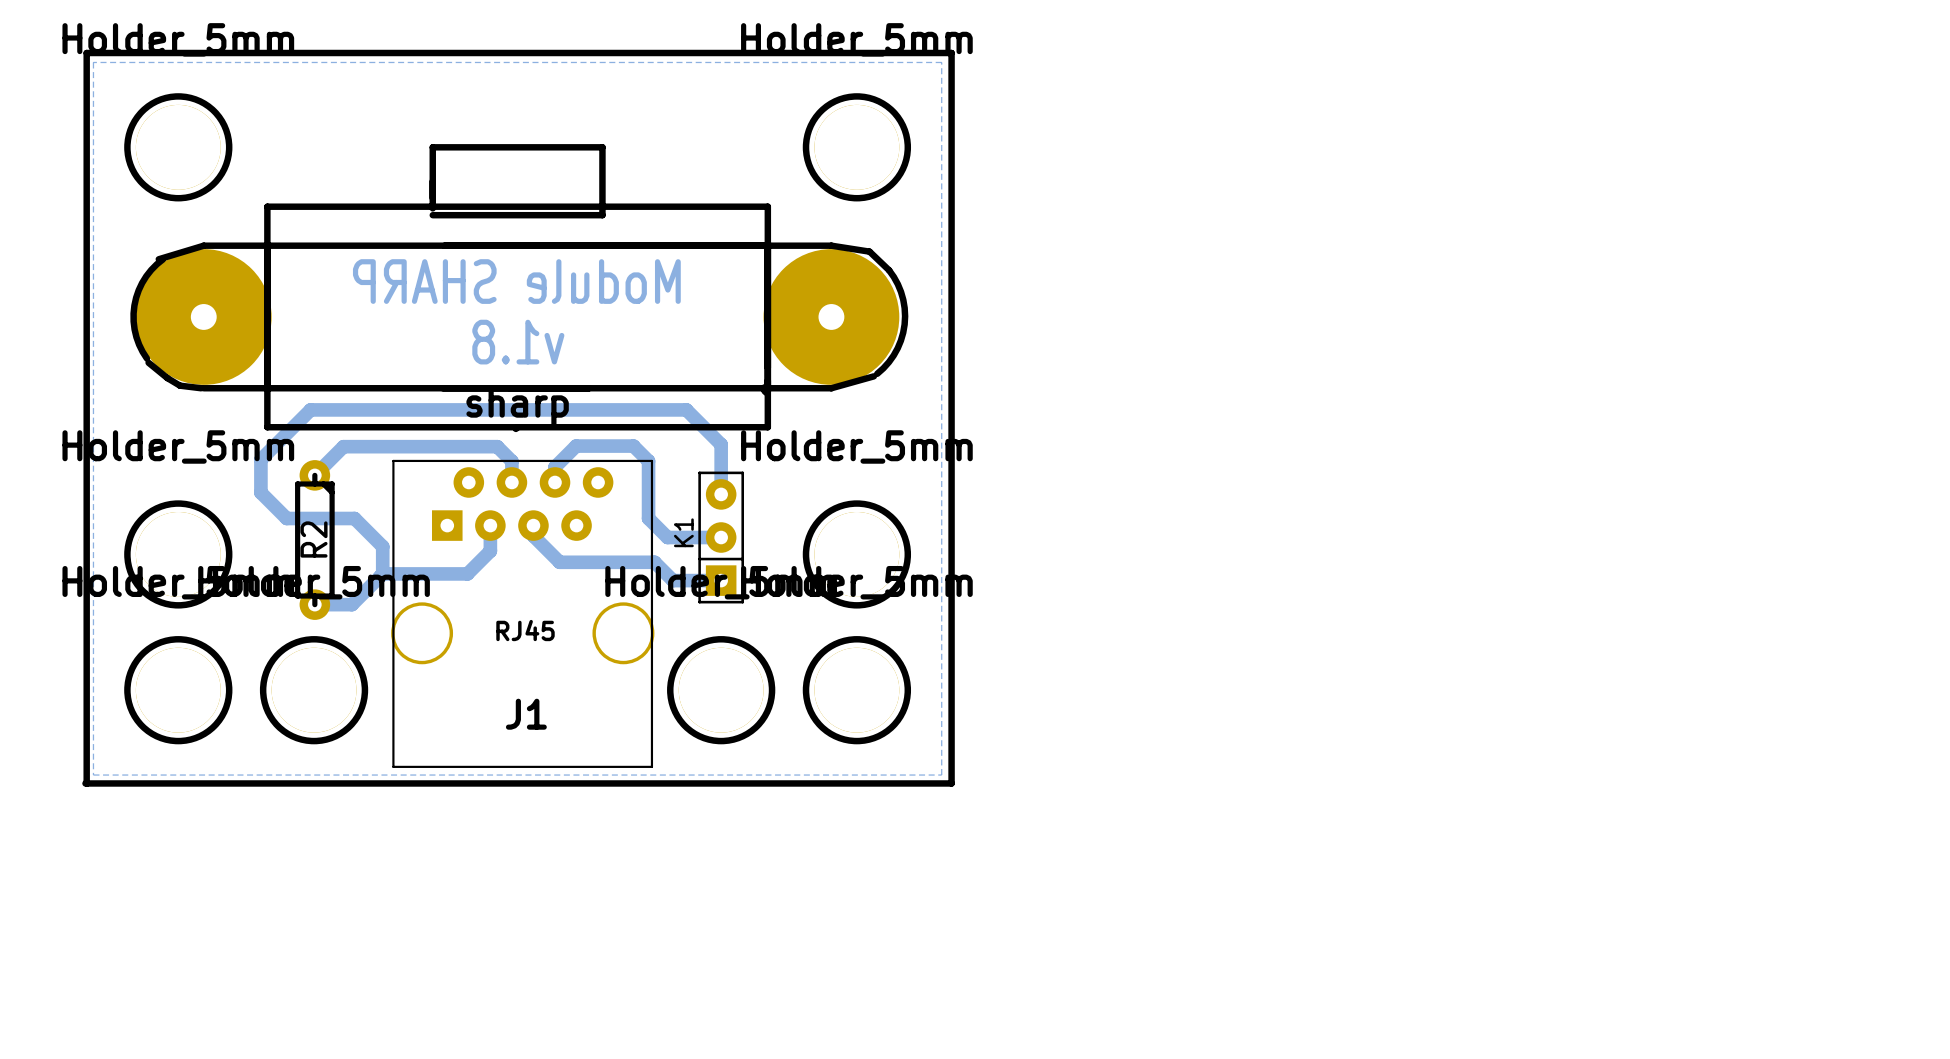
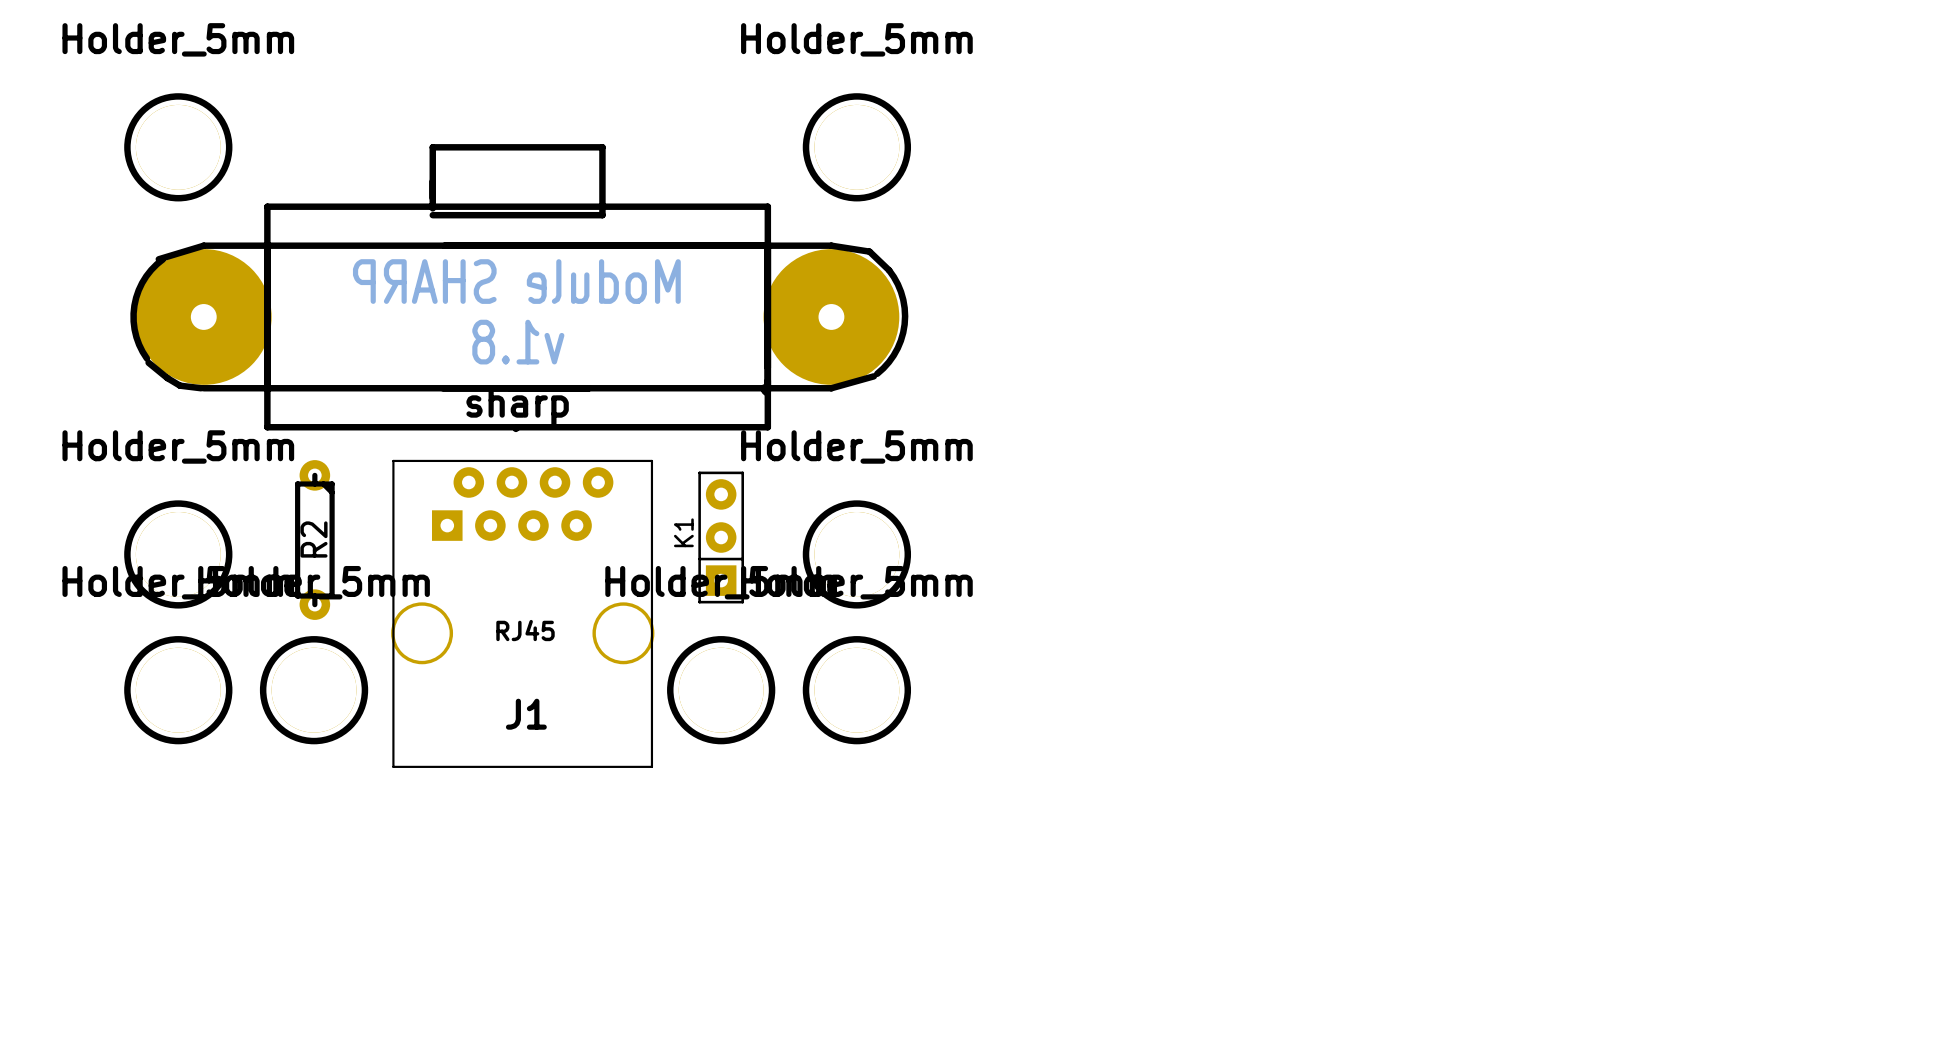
bottom zone outline: (93, 62) (941, 62) (941, 775) (93, 775) (93, 62) -> none
bottom track: (314, 475) (343, 446) (497, 446) (511, 461) (511, 482) -> none
bottom track: (555, 482) (555, 467) (576, 446) (633, 446) (648, 461) (648, 518) (667, 537) (721, 537) -> none
bottom track: (721, 494) (721, 444) (686, 409) (310, 409) (260, 459) (260, 492) (286, 518) (354, 518) (382, 546) (382, 573) -> none
bottom track: (490, 525) (490, 551) (467, 573) (382, 573) -> none
bottom track: (533, 525) (533, 536) (559, 562) (654, 562) (672, 580) (721, 580) -> none
bottom track: (382, 573) (352, 604) (314, 604) -> none
board edge: (85, 783) (951, 783) (951, 53) (86, 53) (86, 783) -> none

